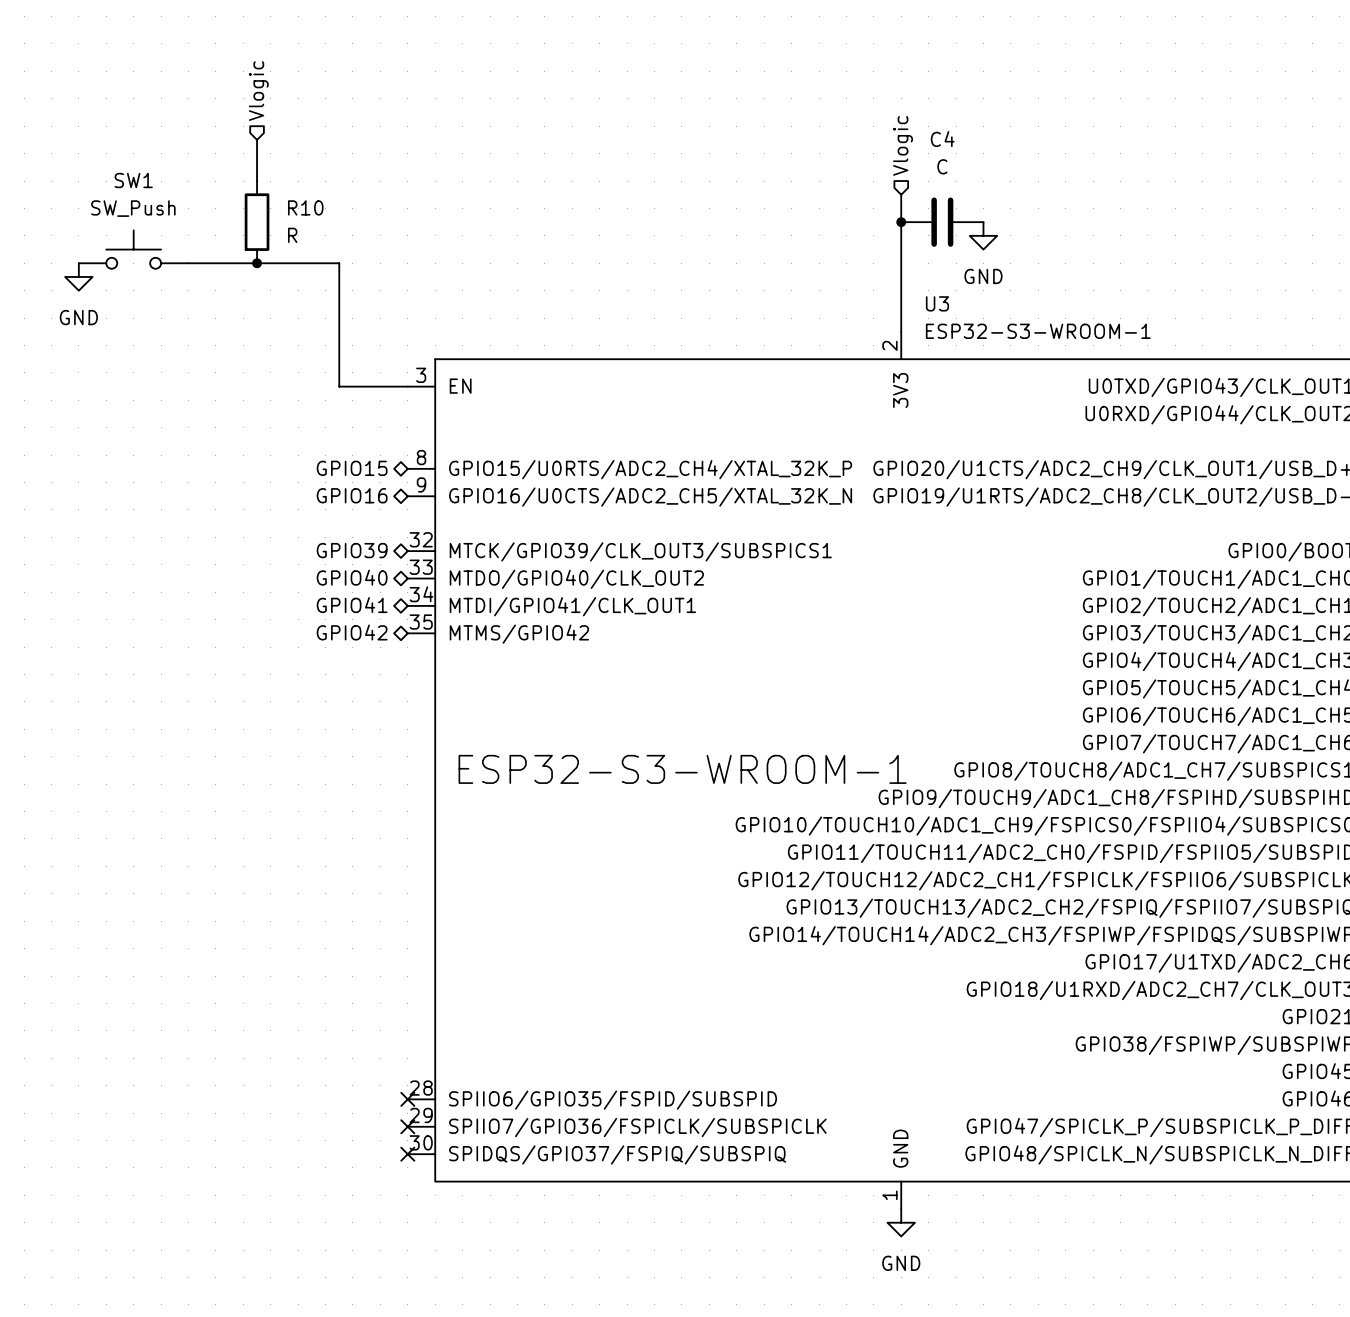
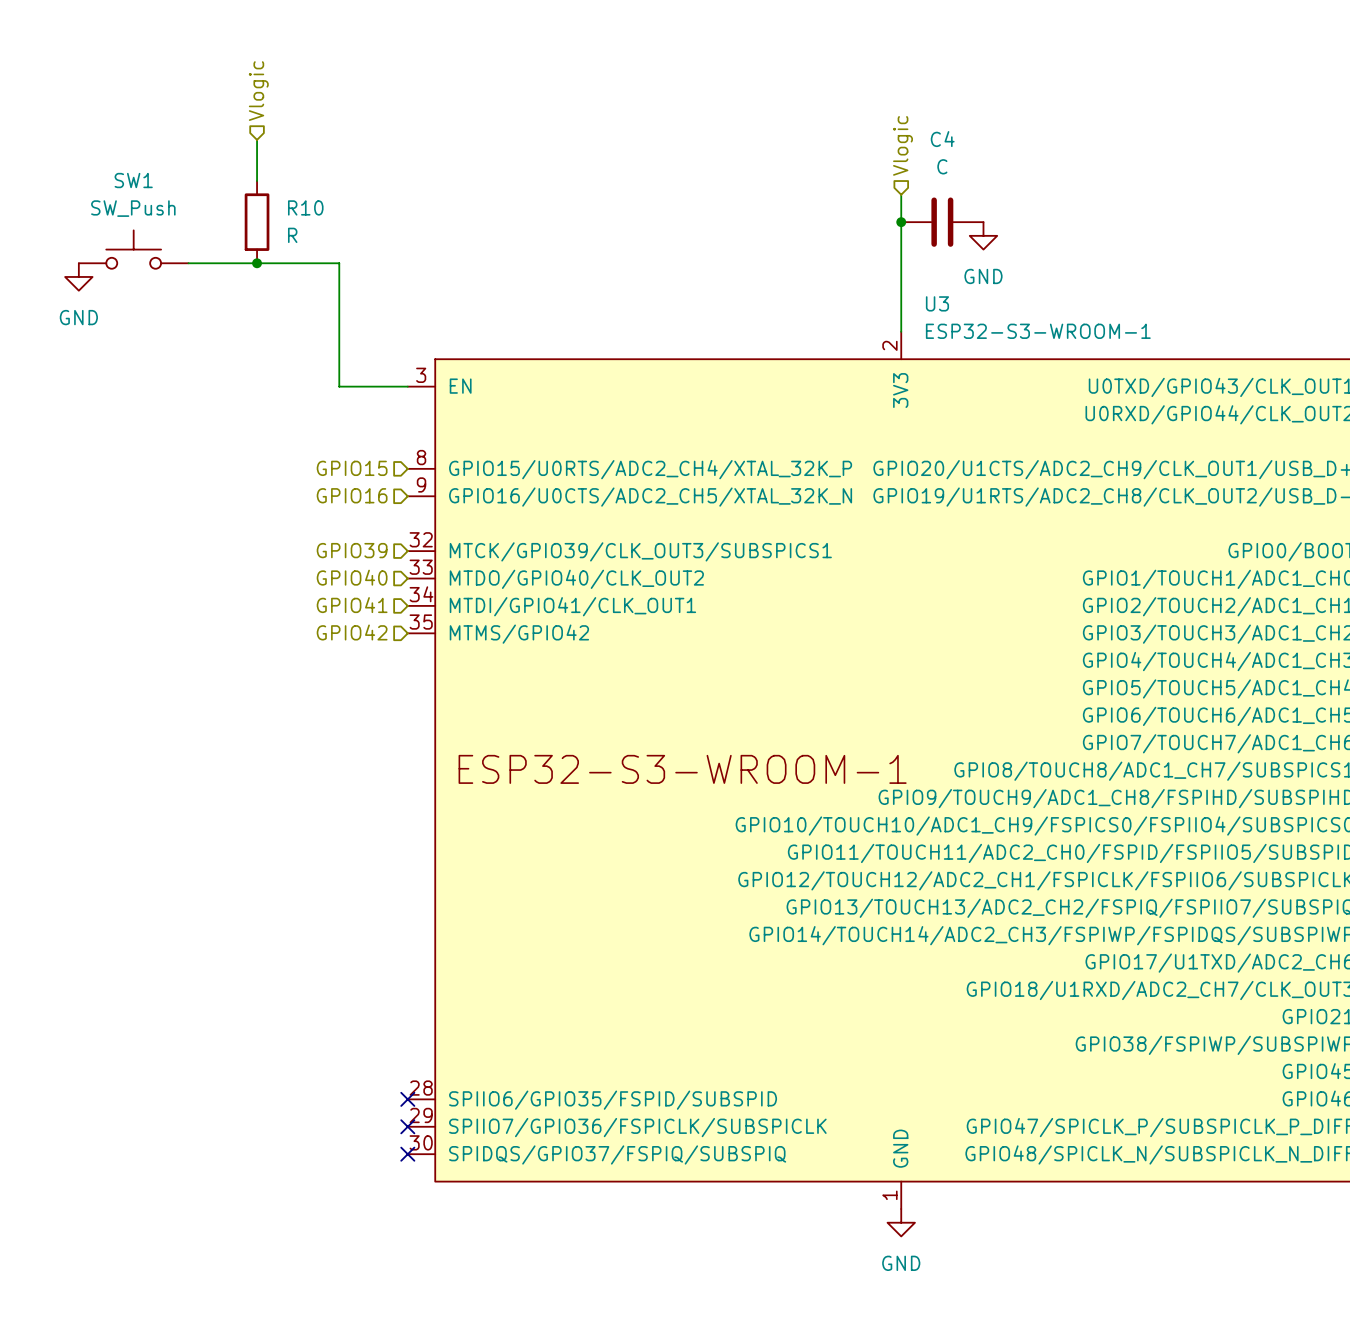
hierarchical label shape: bidirectional (352, 468) -> input (352, 468)
hierarchical label shape: bidirectional (352, 495) -> input (352, 495)
hierarchical label shape: bidirectional (352, 550) -> input (352, 550)
hierarchical label shape: bidirectional (352, 577) -> input (352, 577)
hierarchical label shape: bidirectional (352, 605) -> input (352, 605)
hierarchical label shape: bidirectional (352, 632) -> input (352, 632)

